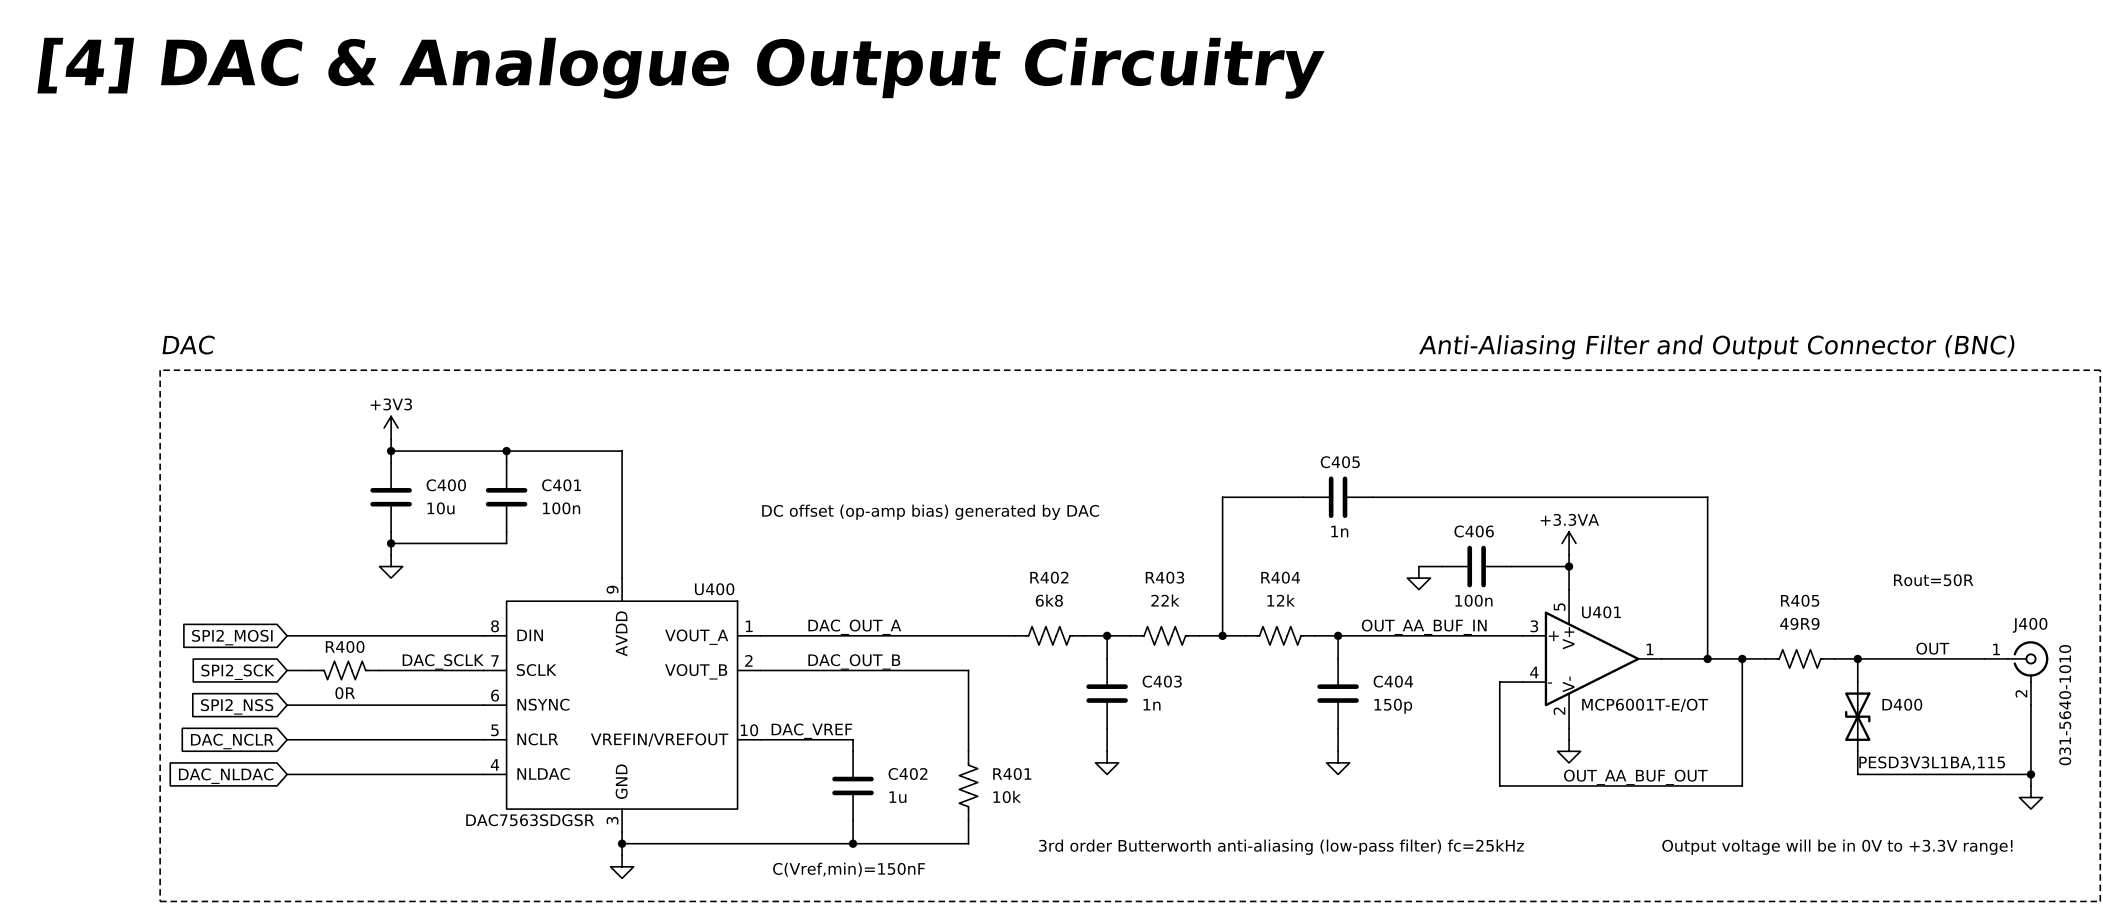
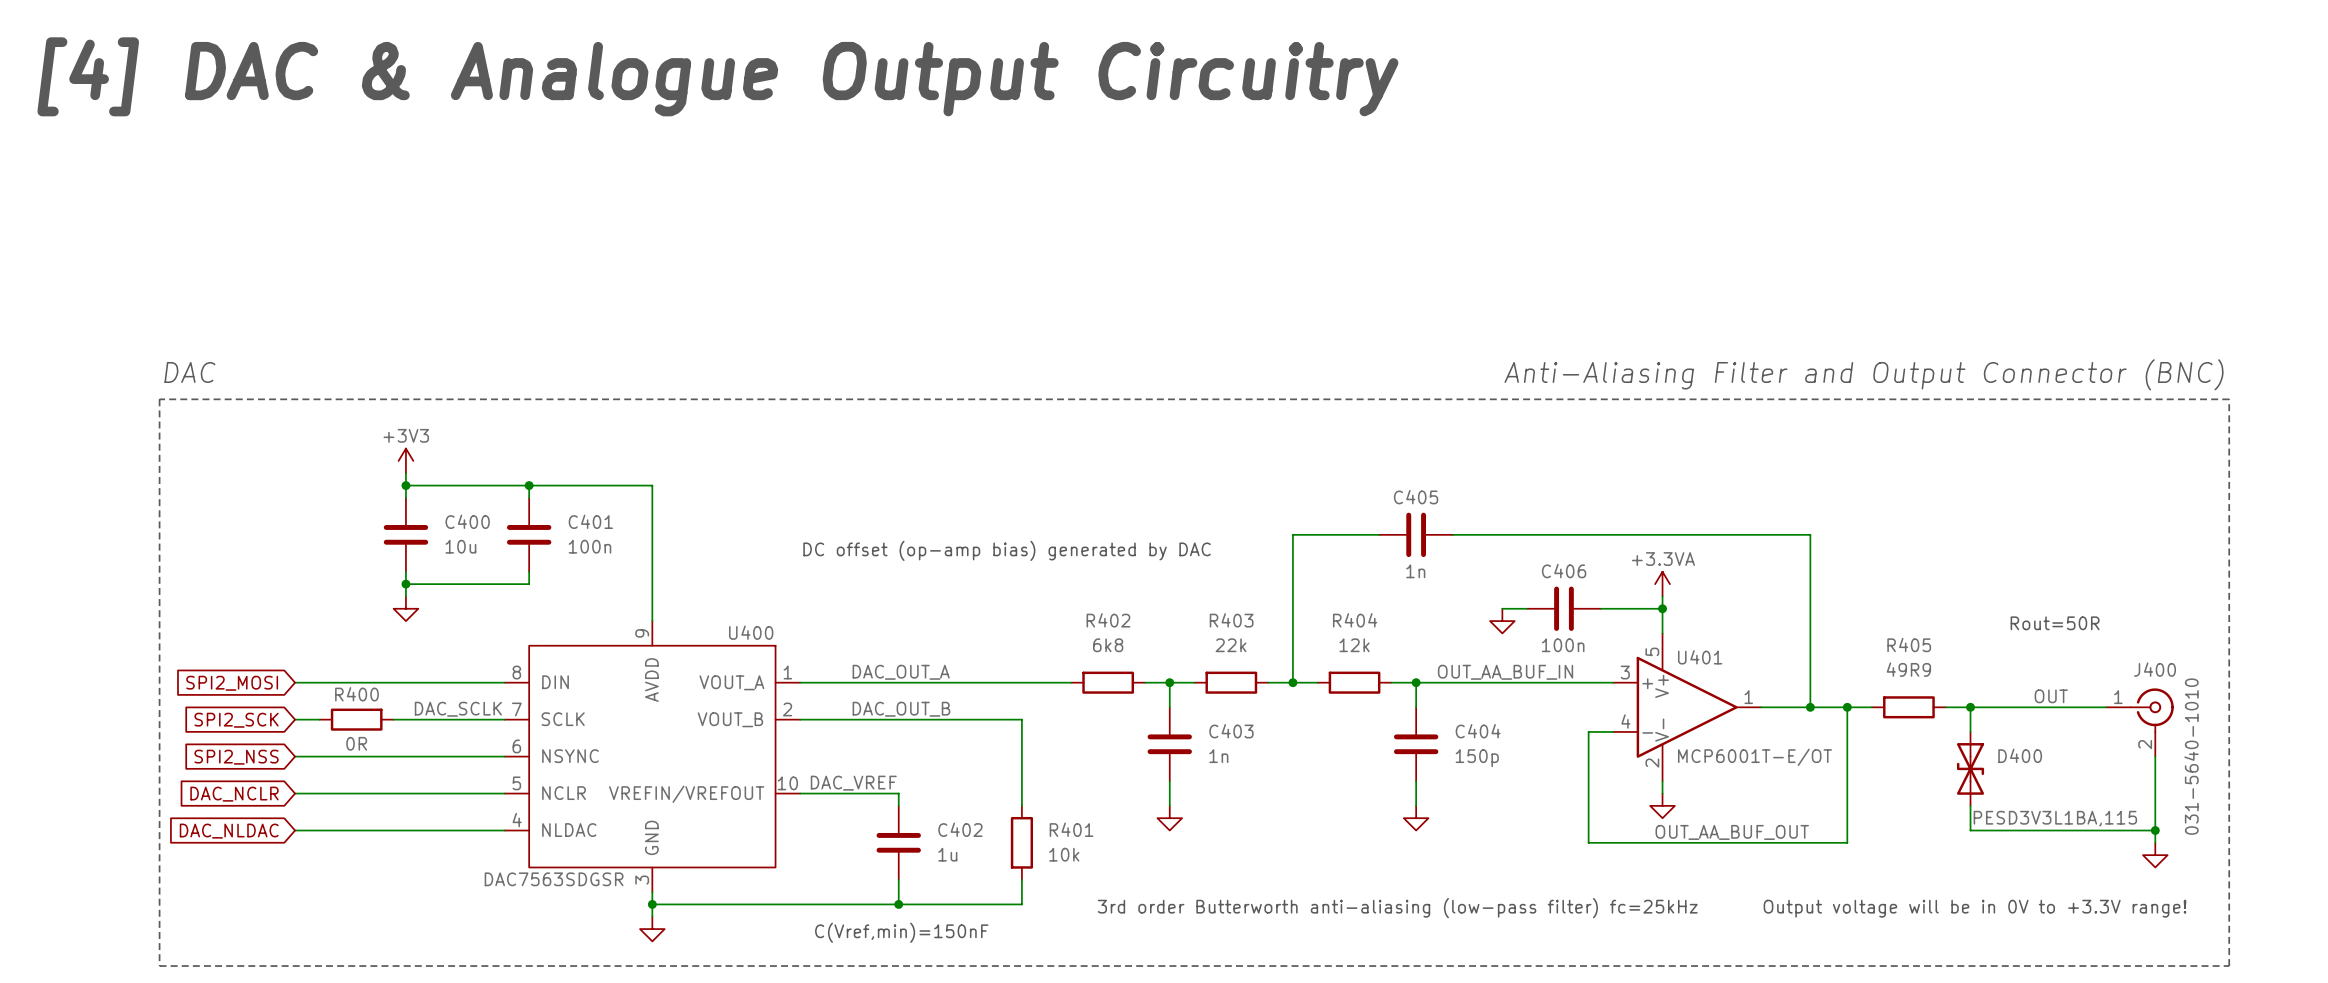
R402 symbol: [1014, 626, 1085, 646] -> [1071, 671, 1146, 694]
R403 symbol: [1130, 626, 1200, 646] -> [1194, 671, 1269, 694]
R404 symbol: [1245, 626, 1315, 646] -> [1317, 671, 1392, 694]
R405 symbol: [1765, 649, 1835, 669] -> [1871, 696, 1946, 719]
R400 symbol: [310, 661, 380, 680] -> [319, 708, 394, 731]
R401 symbol: [959, 751, 978, 821] -> [1010, 805, 1034, 880]

